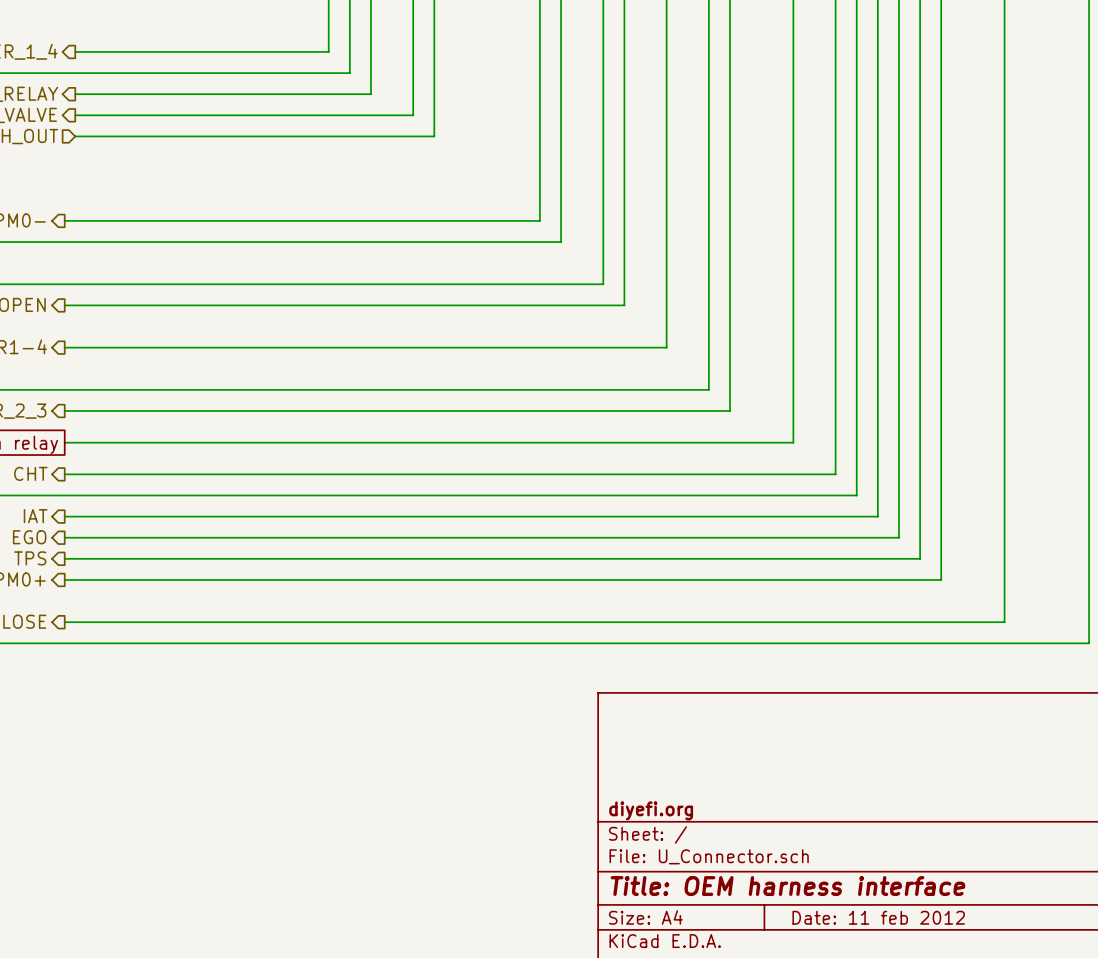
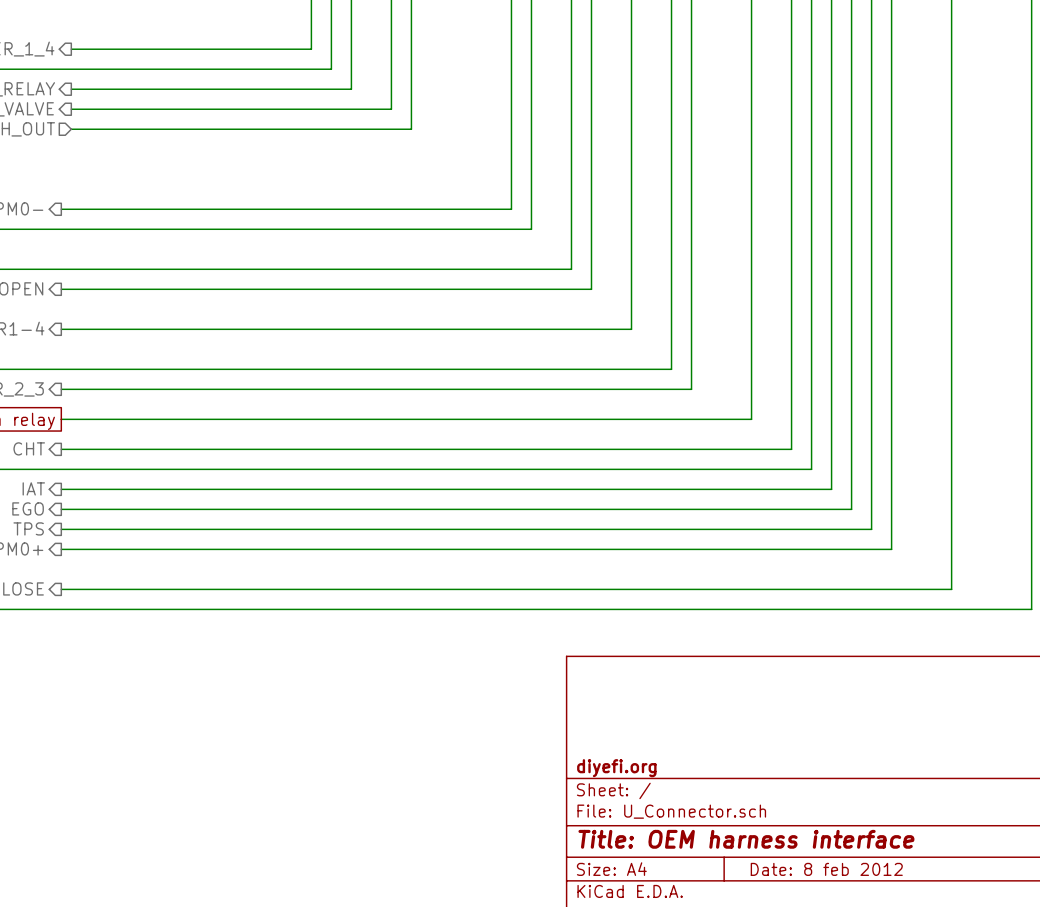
title block: Date: 11 feb 2012 (878, 917) -> Date: 8 feb 2012 (826, 869)

